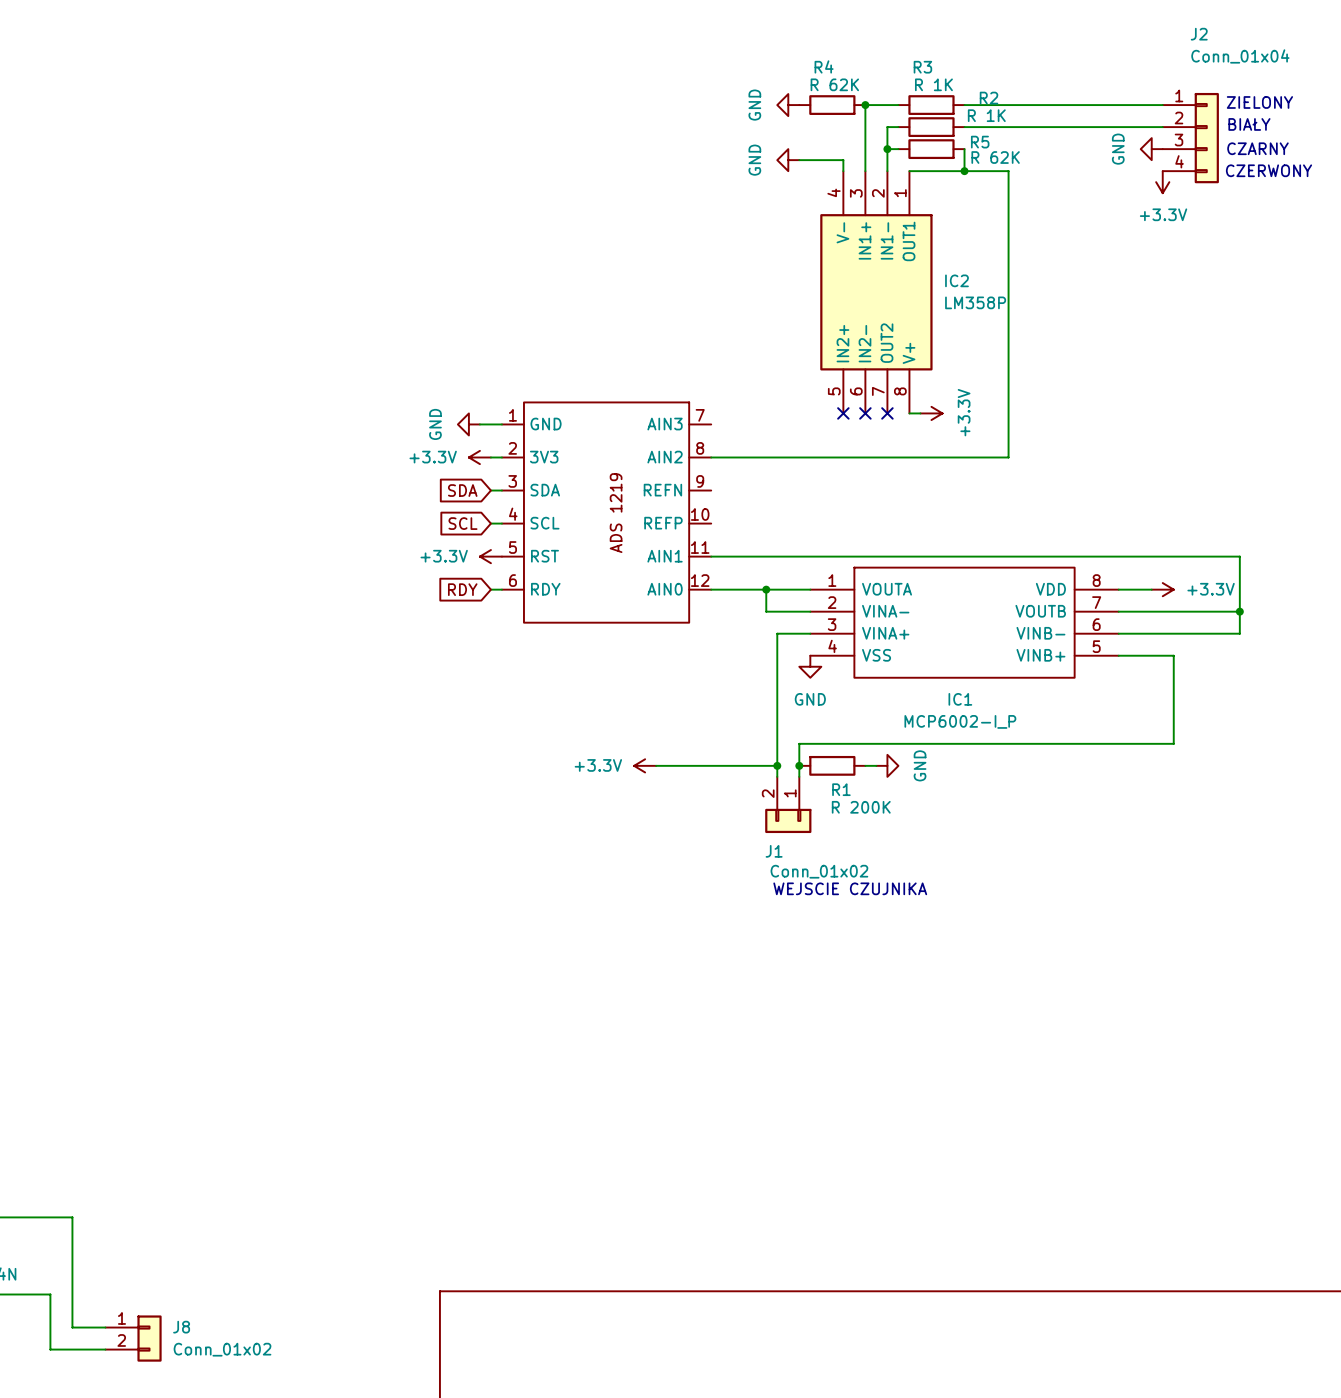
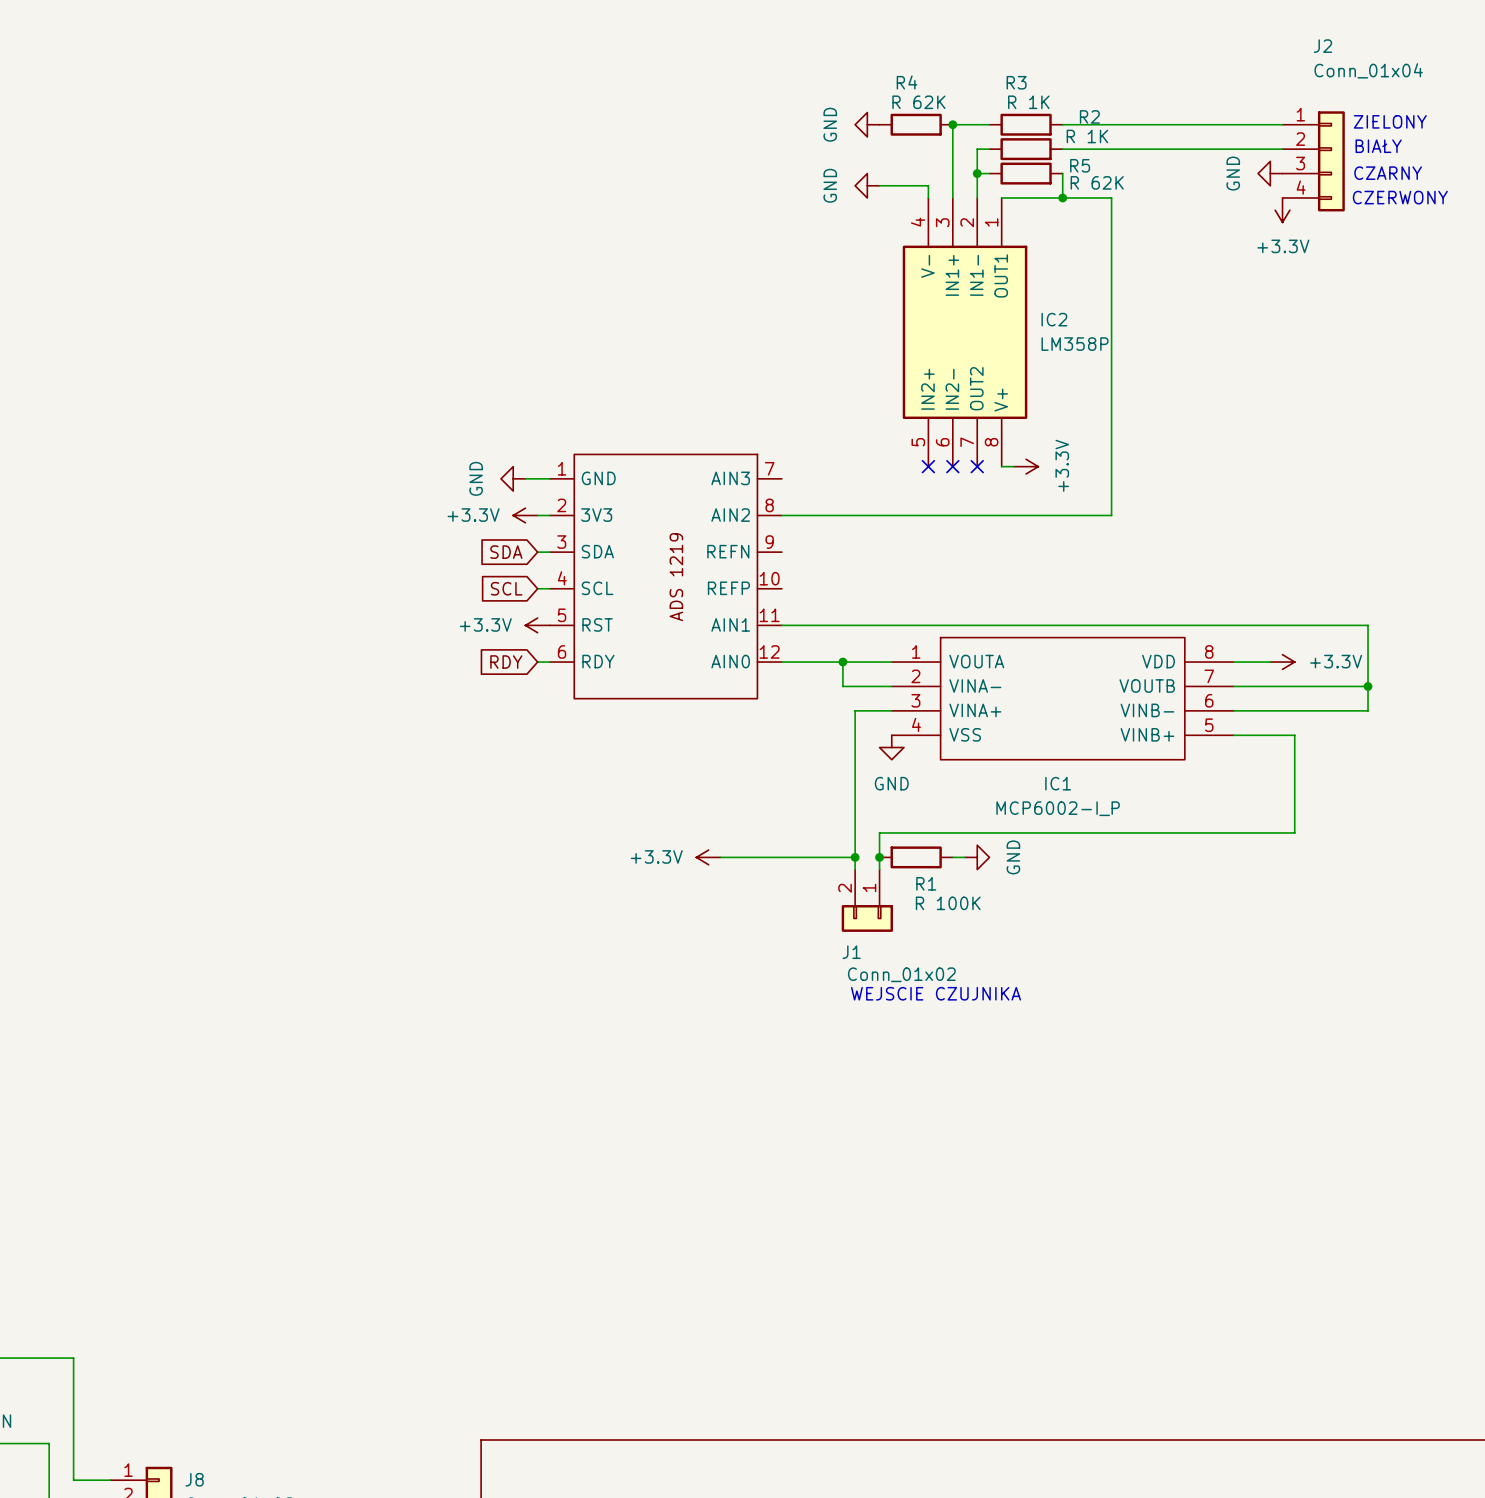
R1 value: R 200K (861, 807) -> R 100K (948, 903)

